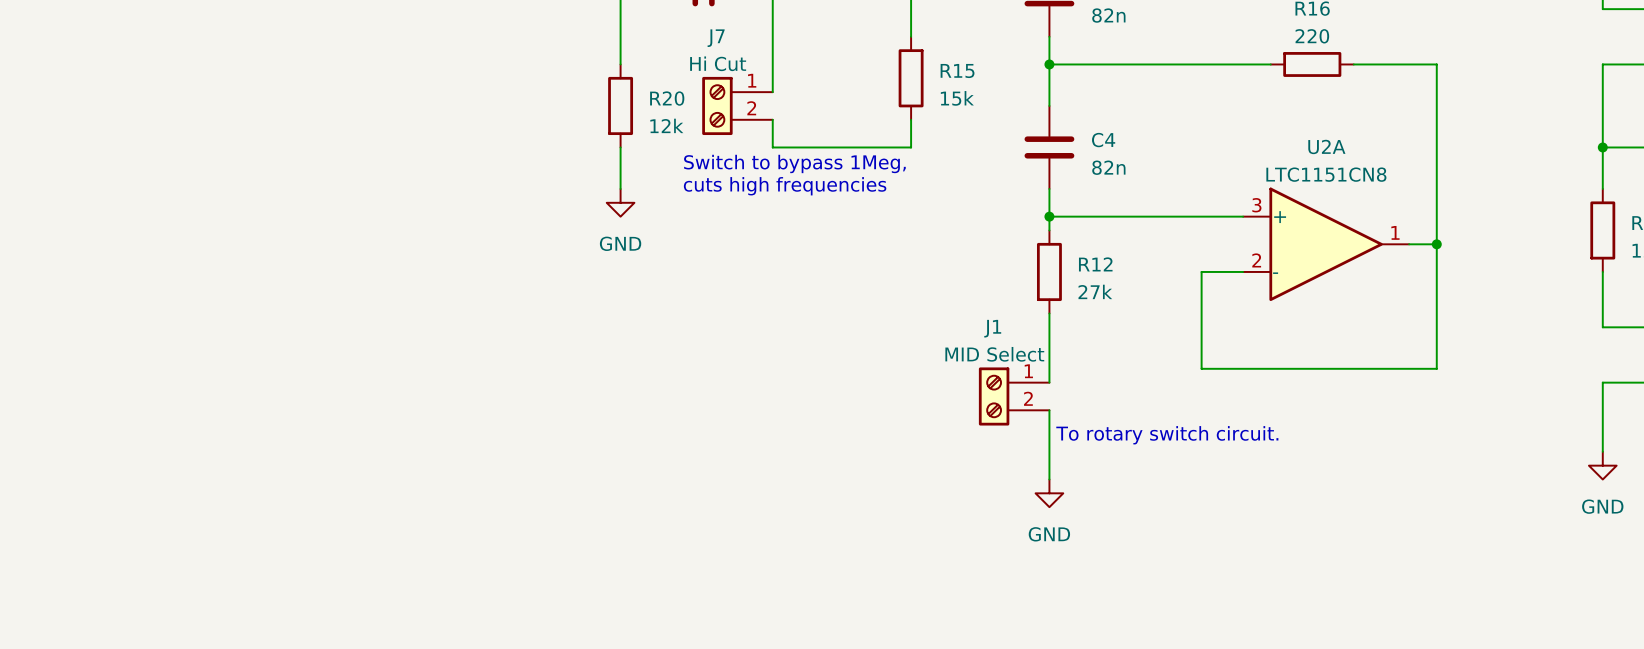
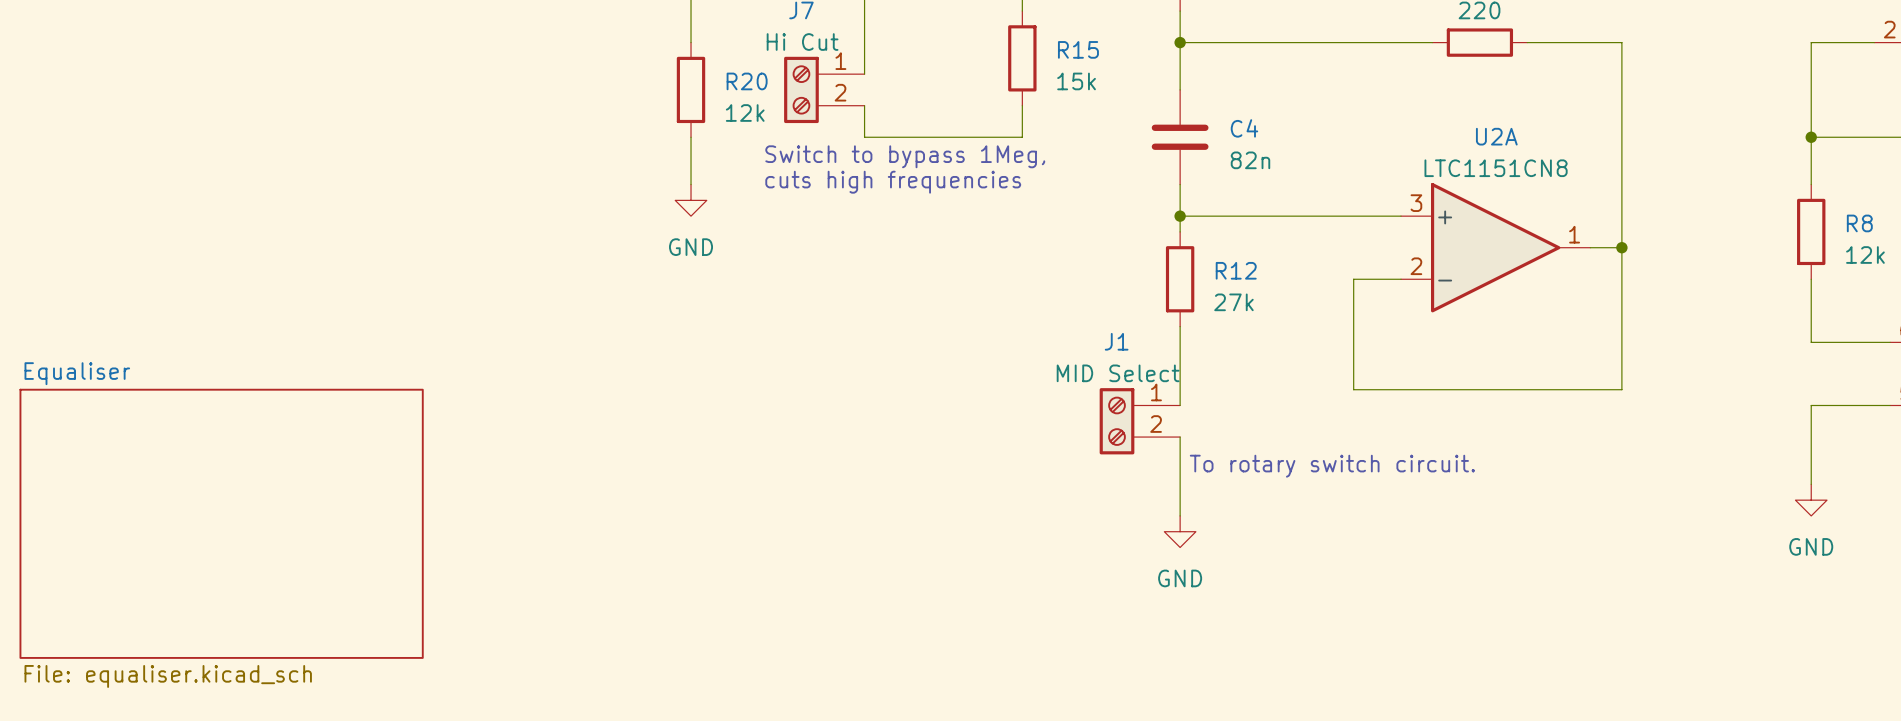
sheet Equaliser: none -> File: equaliser.kicad_sch (221, 523)

